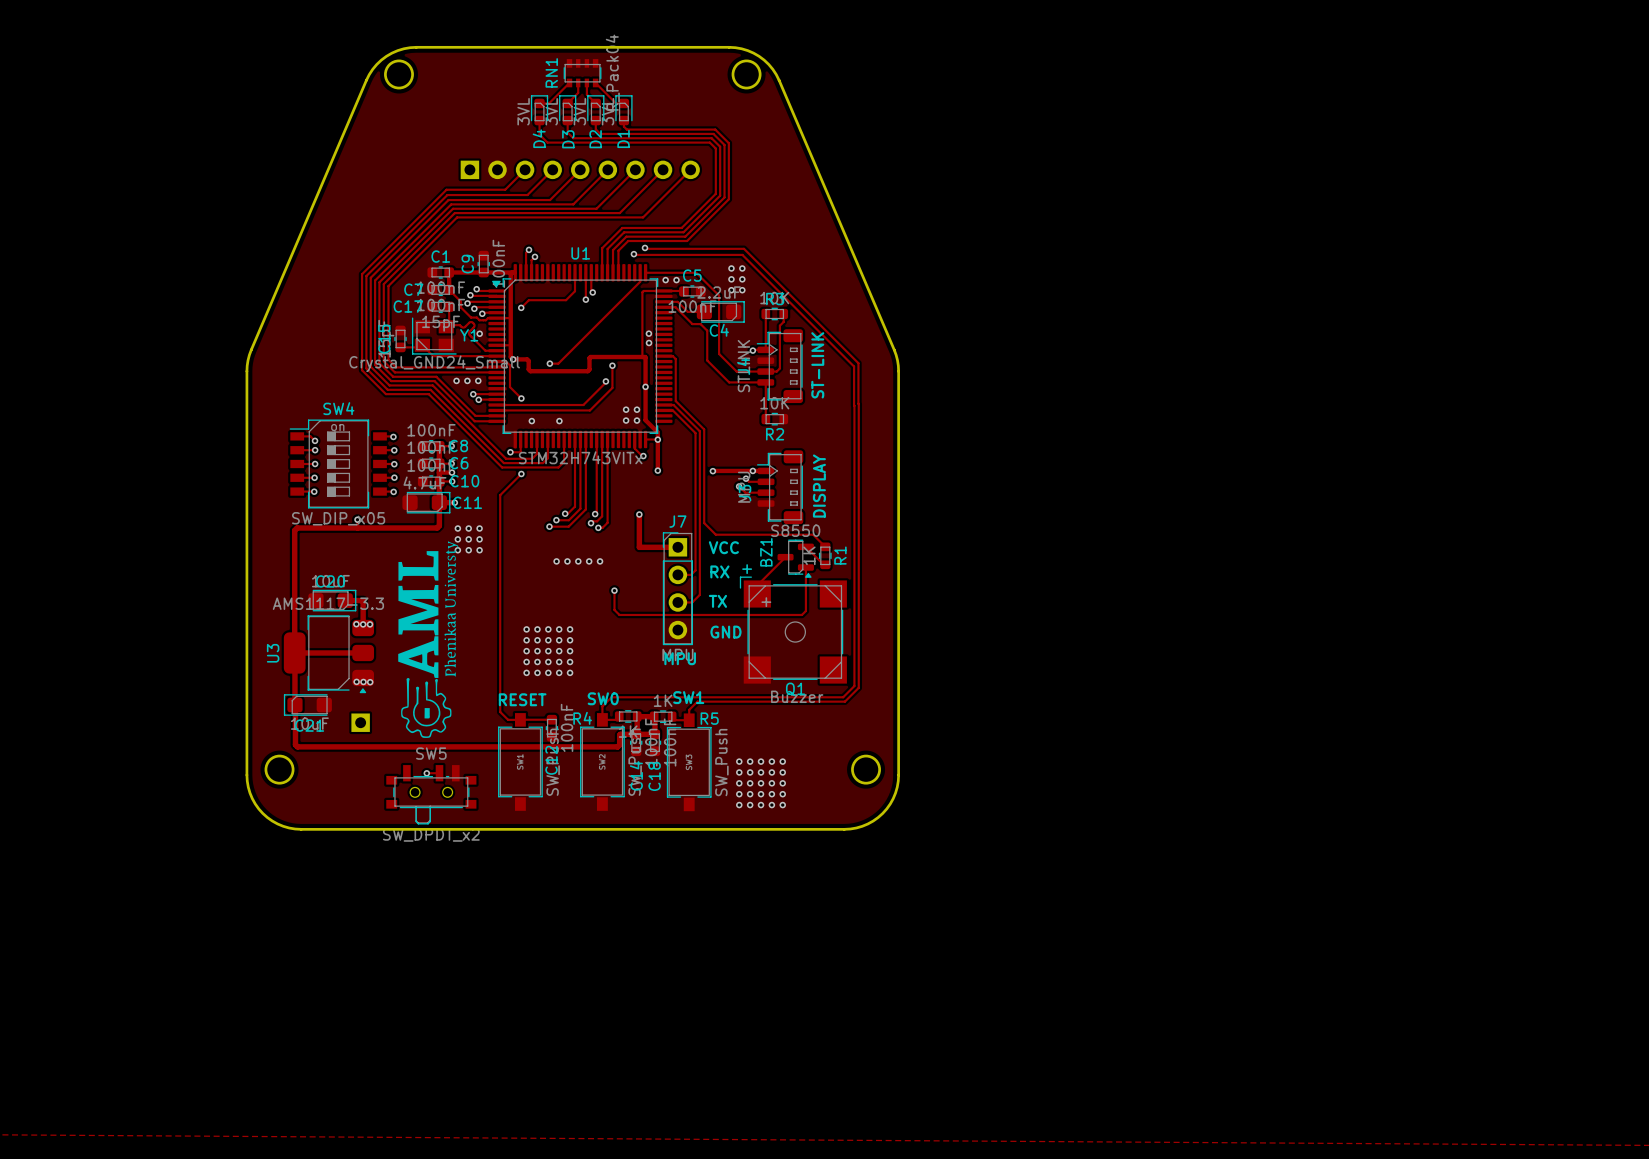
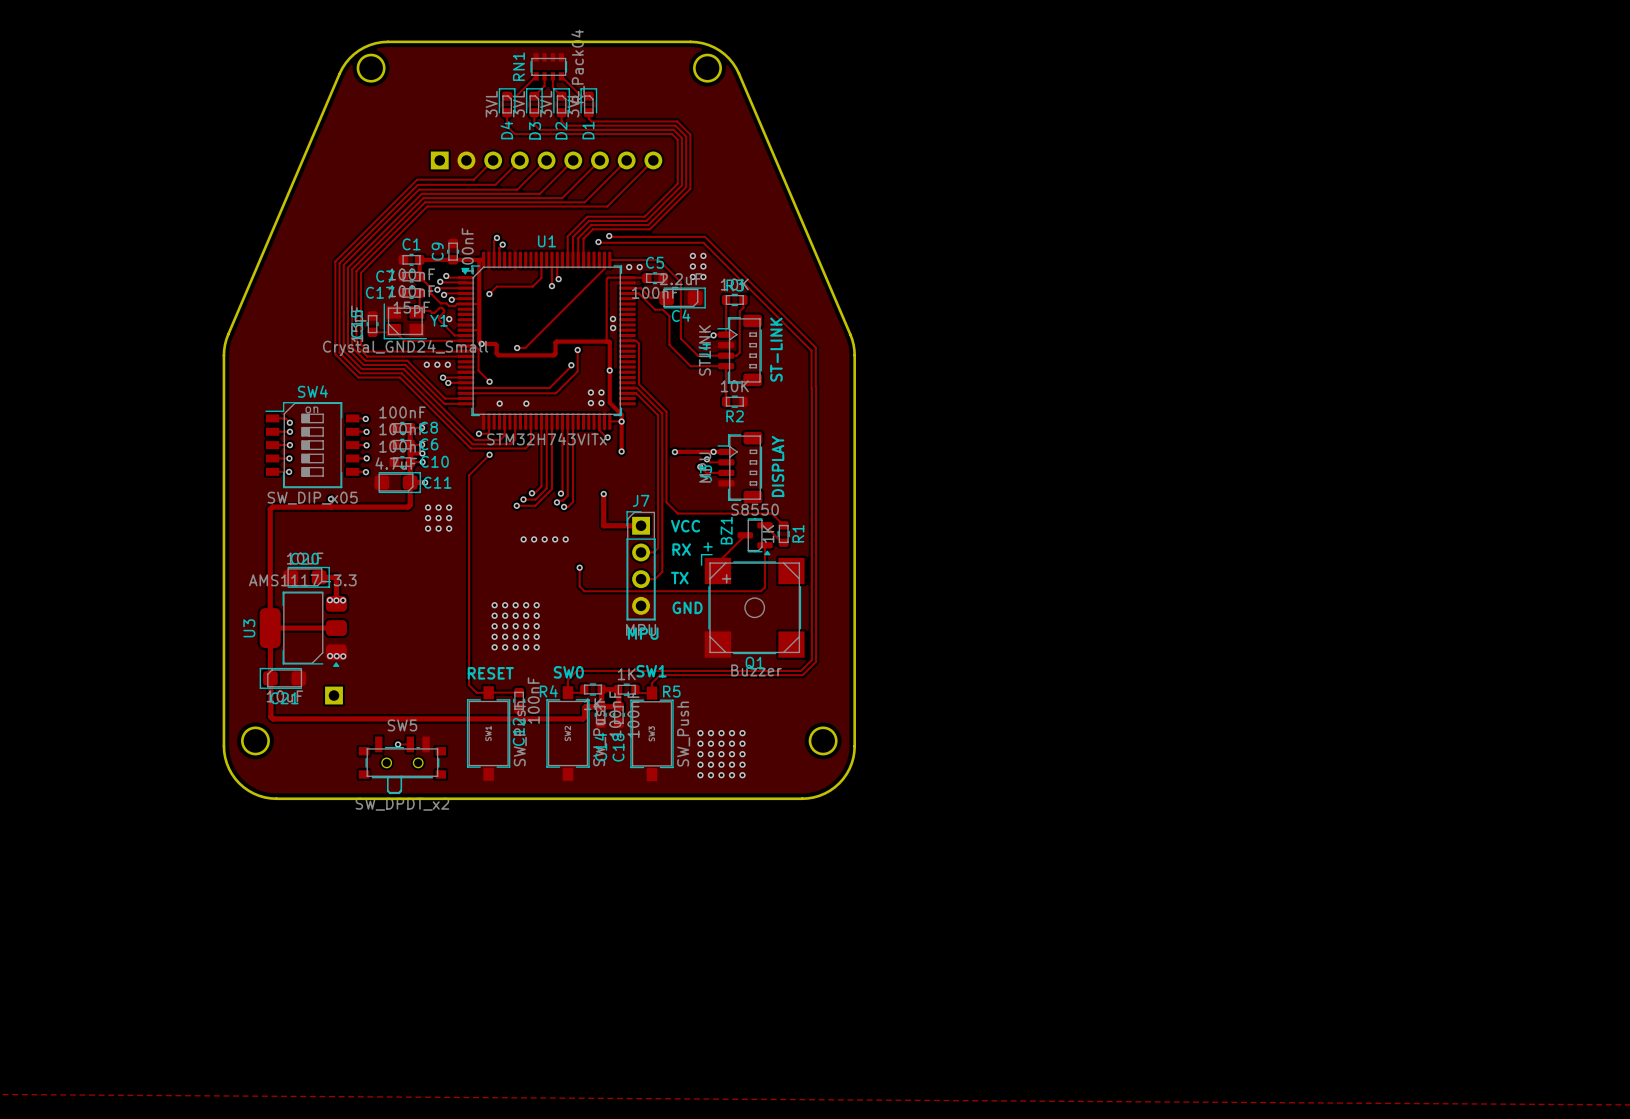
drawing: [398, 541, 459, 738] -> none

